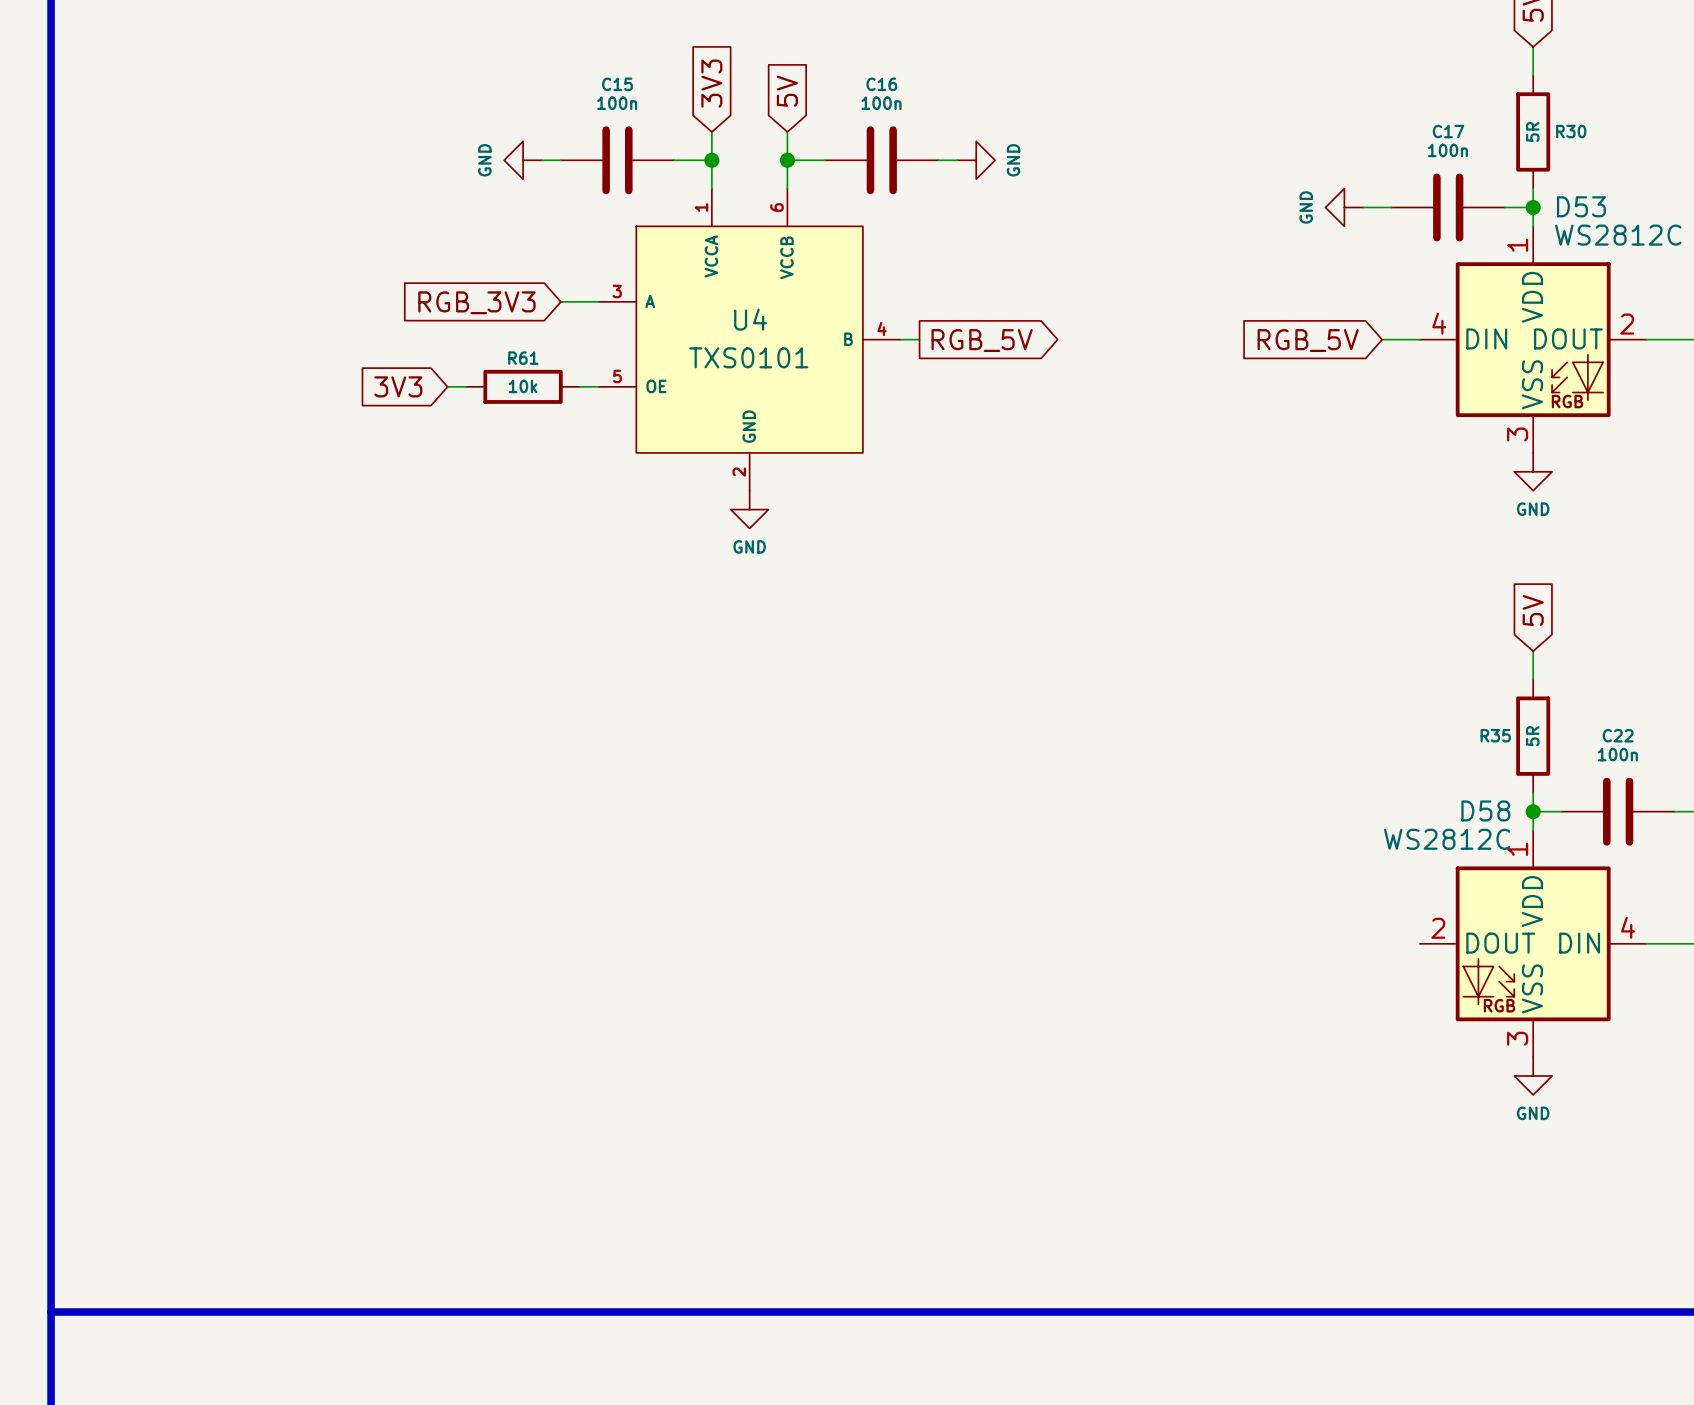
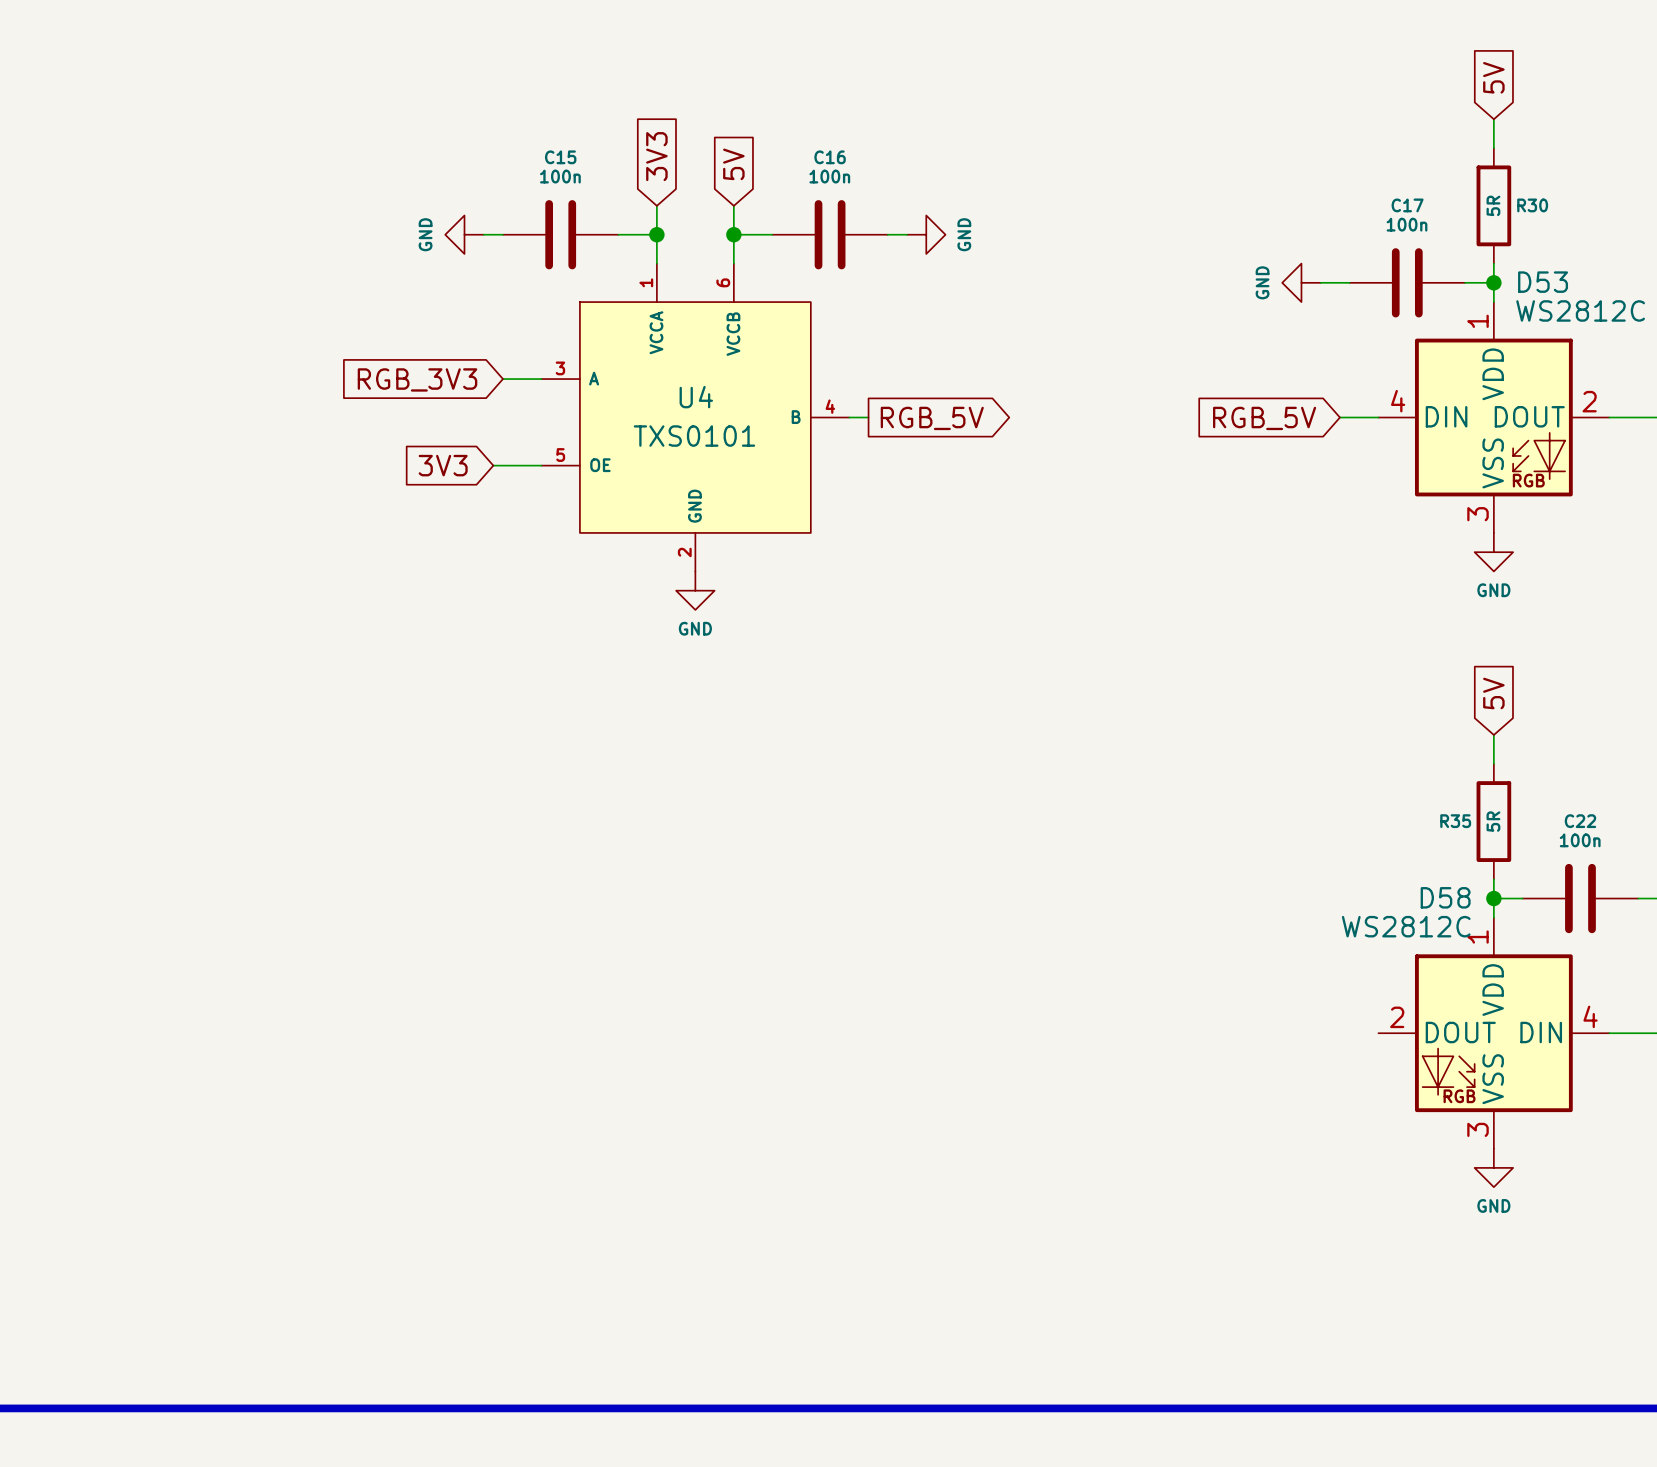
global label position: 3V3 (398, 386) -> 3V3 (443, 465)
wire: (447, 386) (466, 386) -> none
R61: 10k (523, 386) -> none

